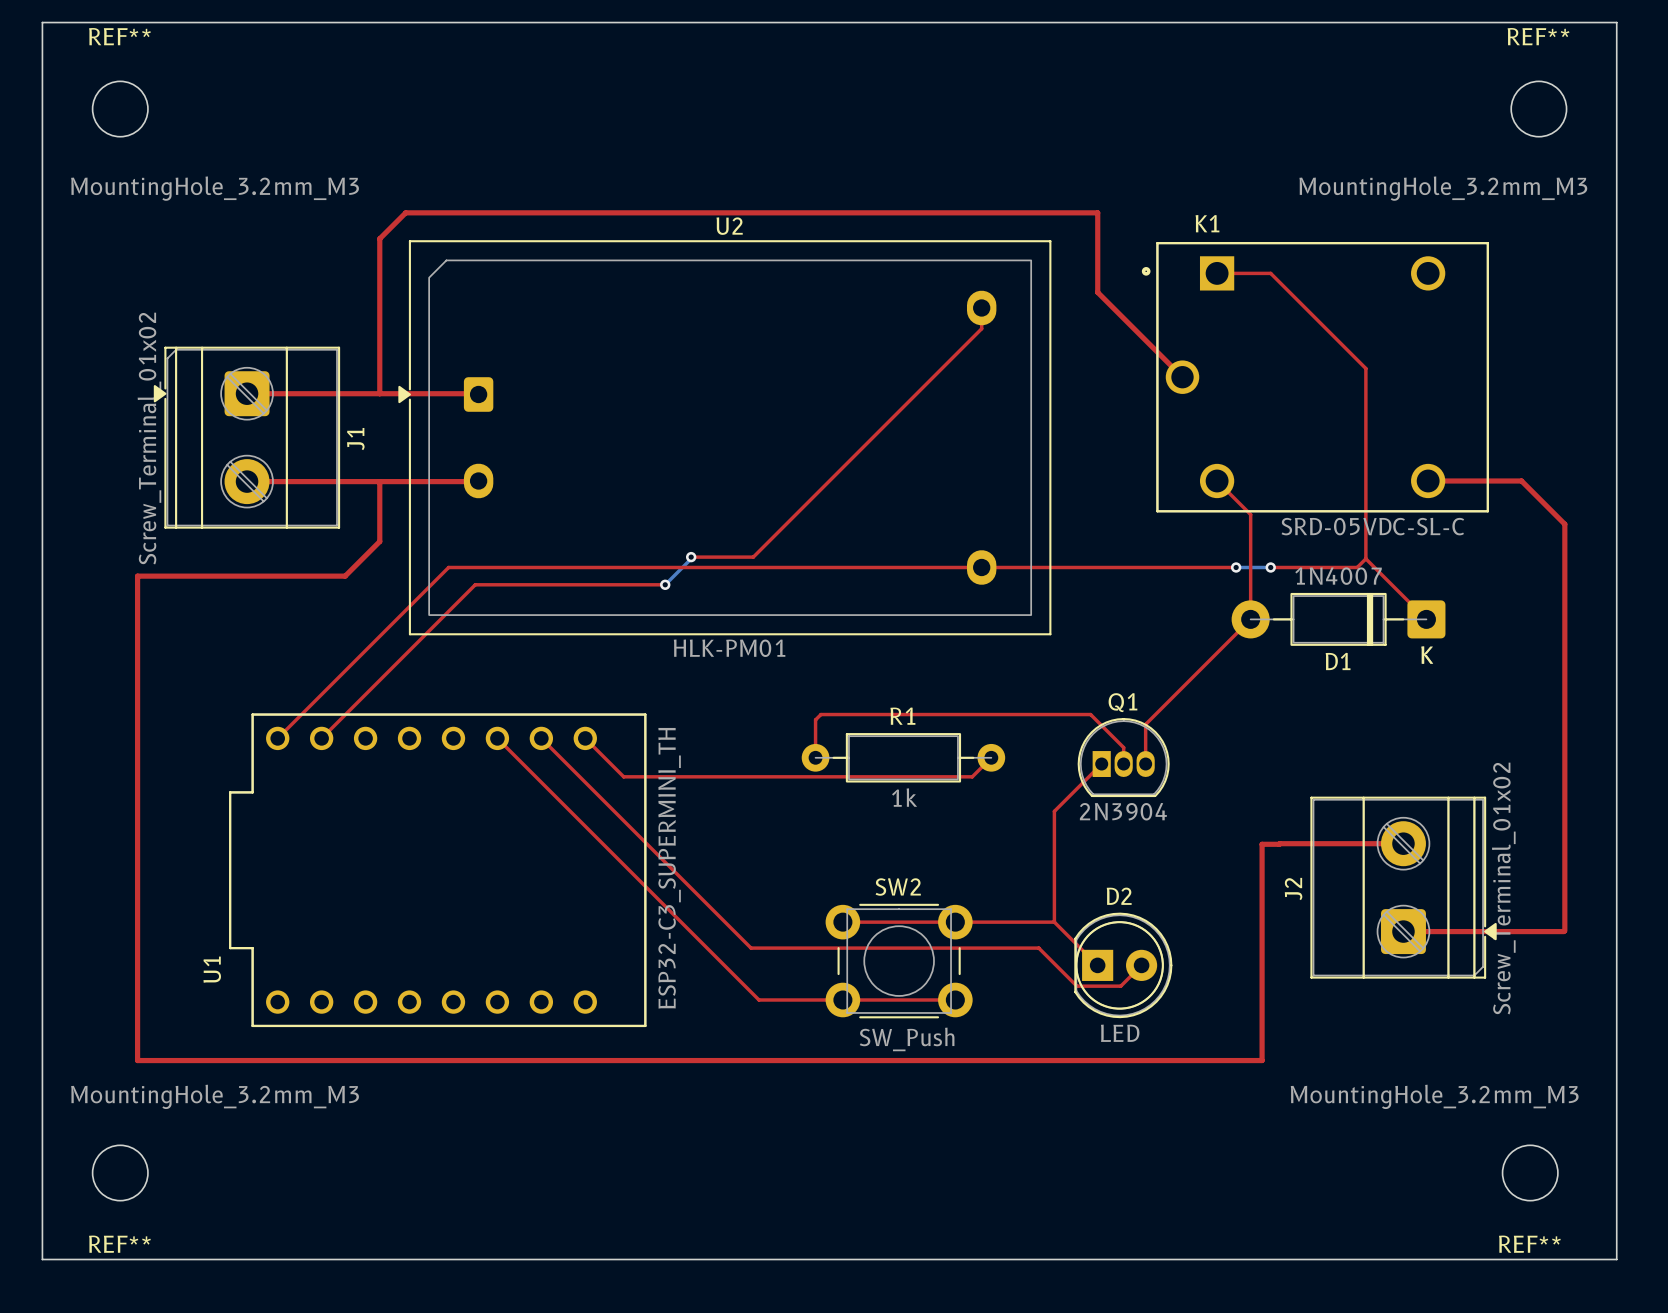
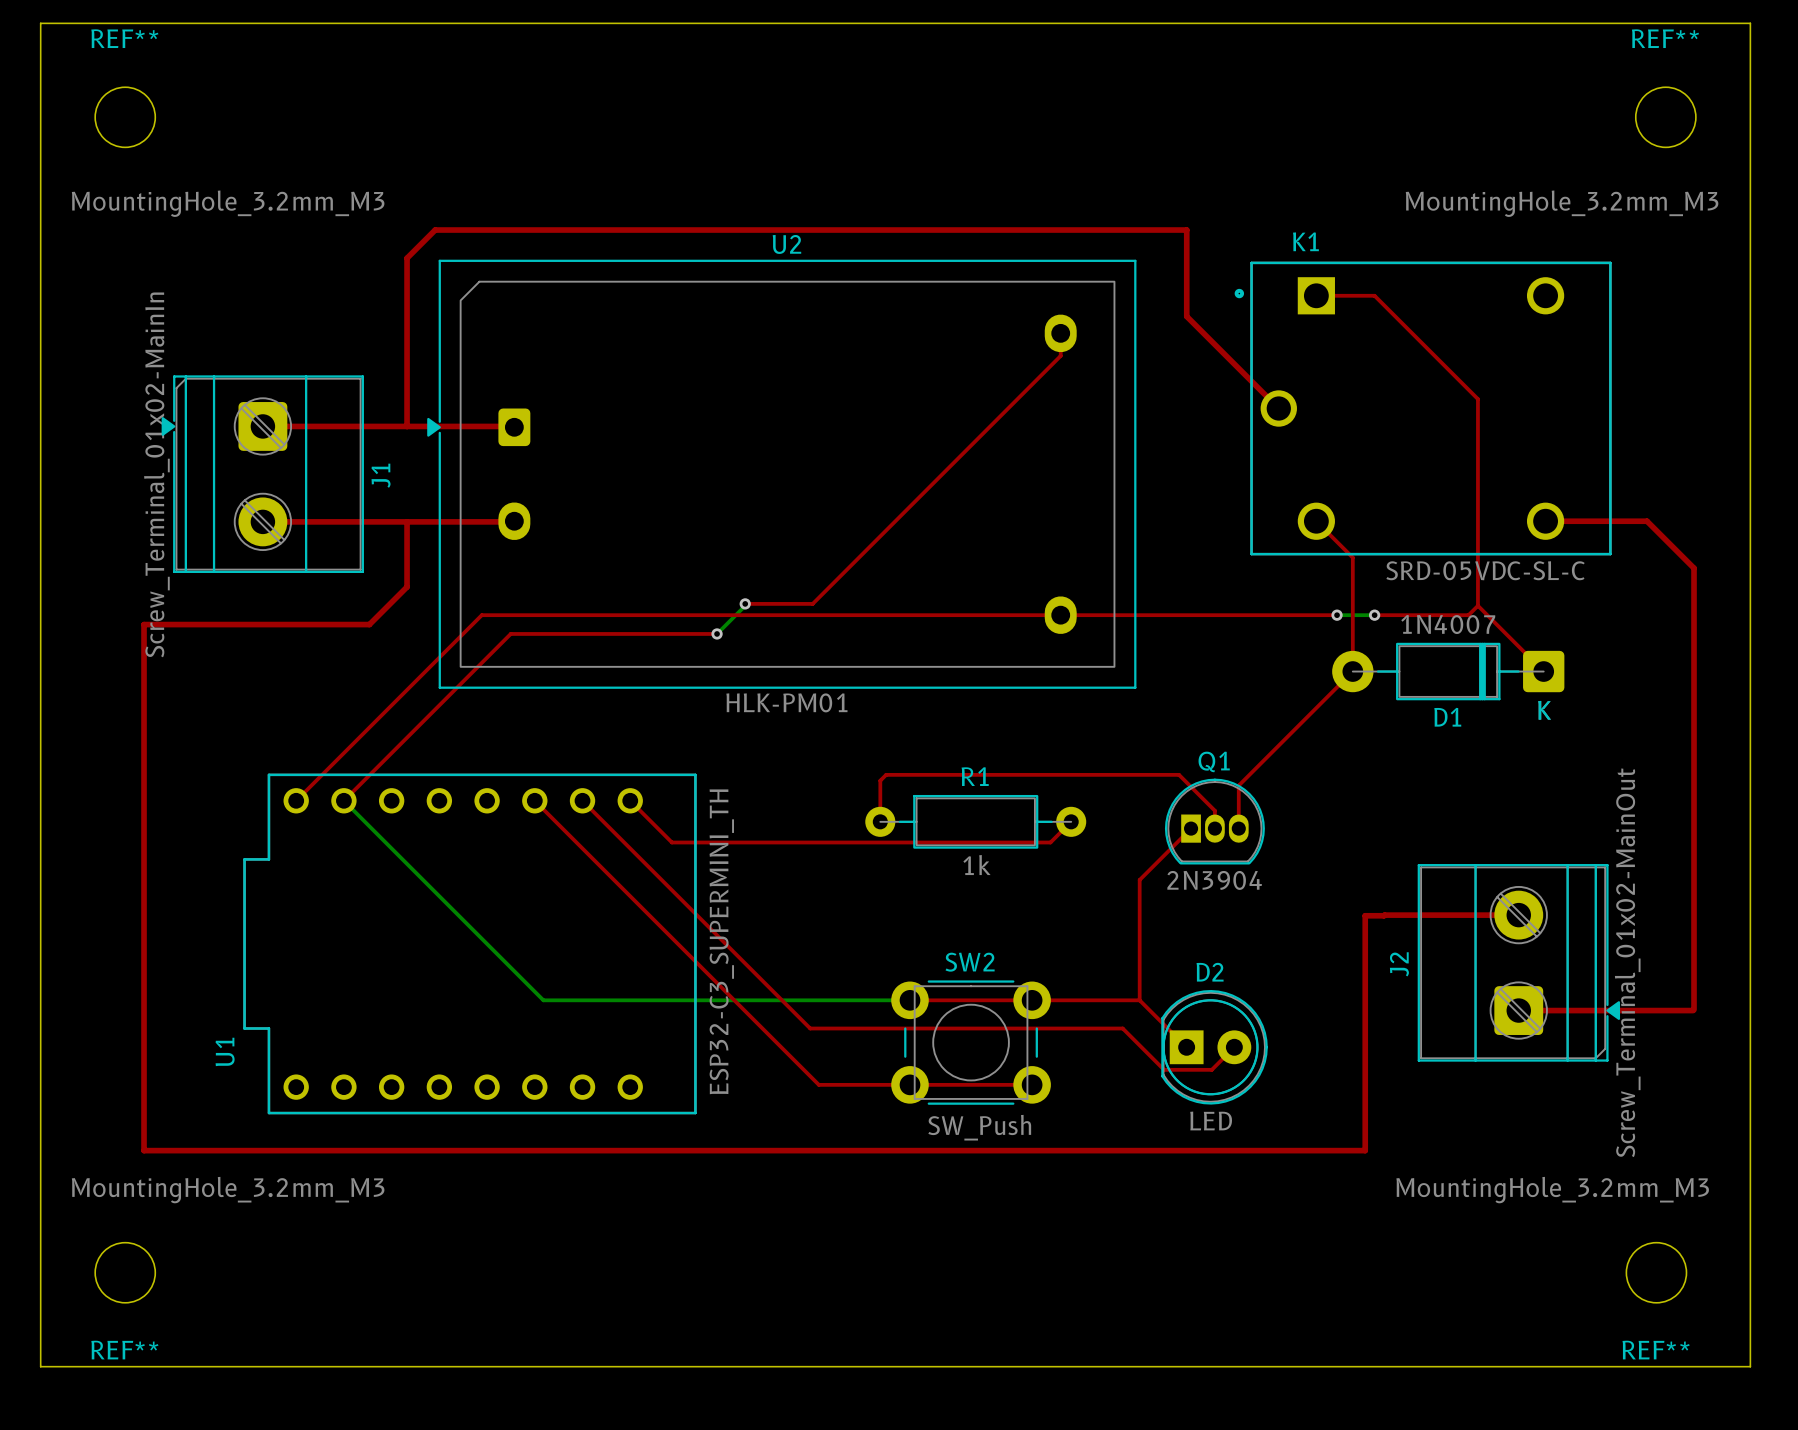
J1 value: Screw_Terminal_01x02 (149, 438) -> Screw_Terminal_01x02-MainIn (156, 474)
bottom track: none -> (343, 800) (543, 1000) (909, 1000)
J2 value: Screw_Terminal_01x02 (1503, 888) -> Screw_Terminal_01x02-MainOut (1627, 962)

